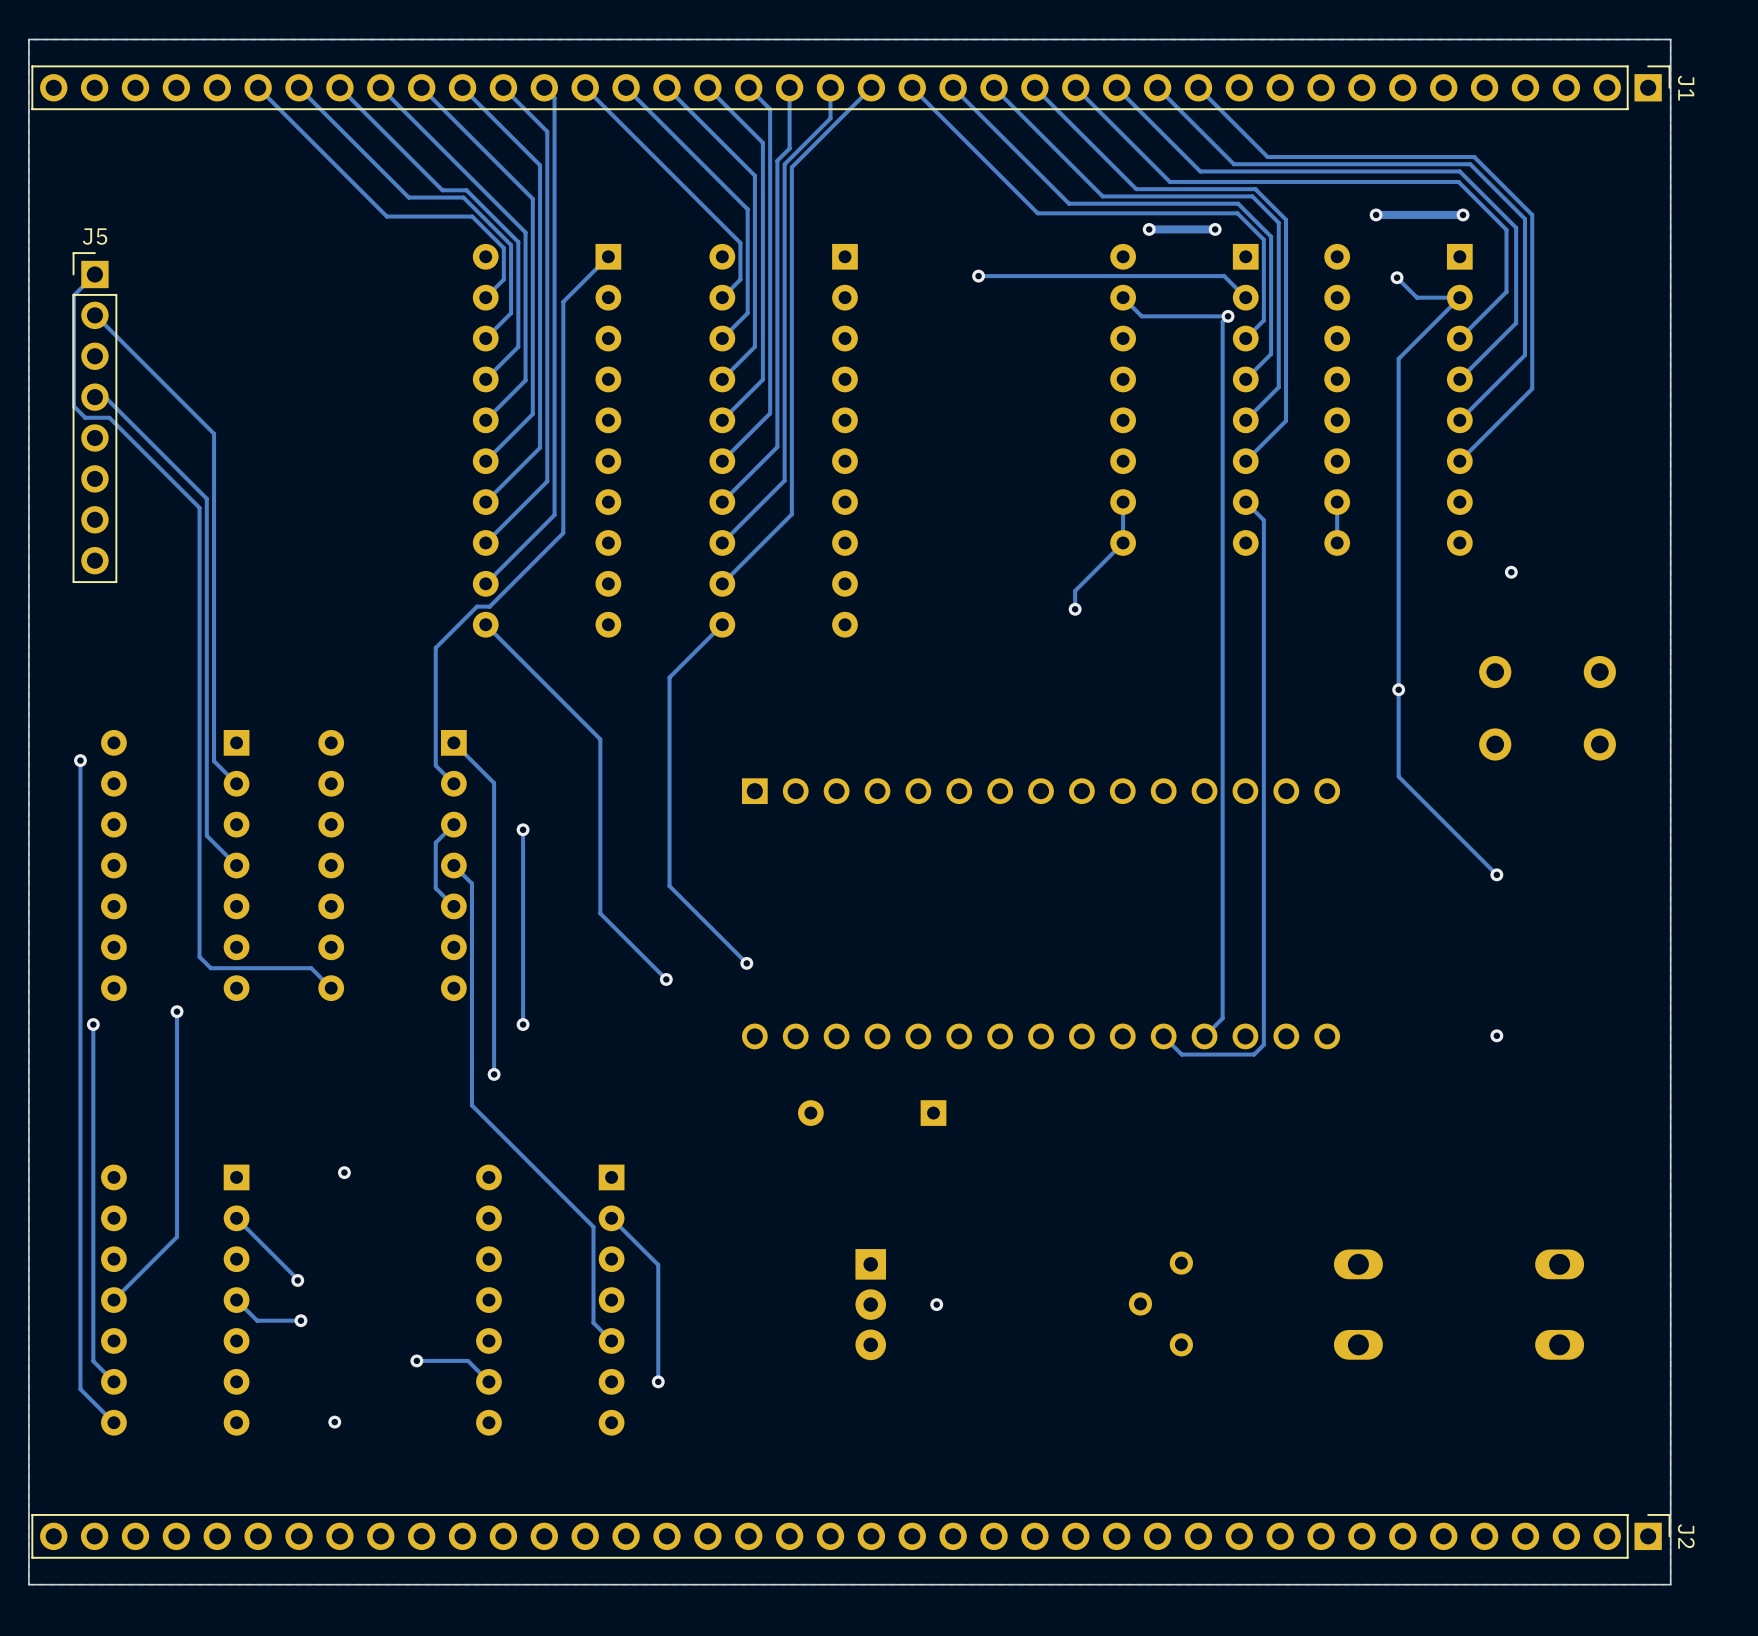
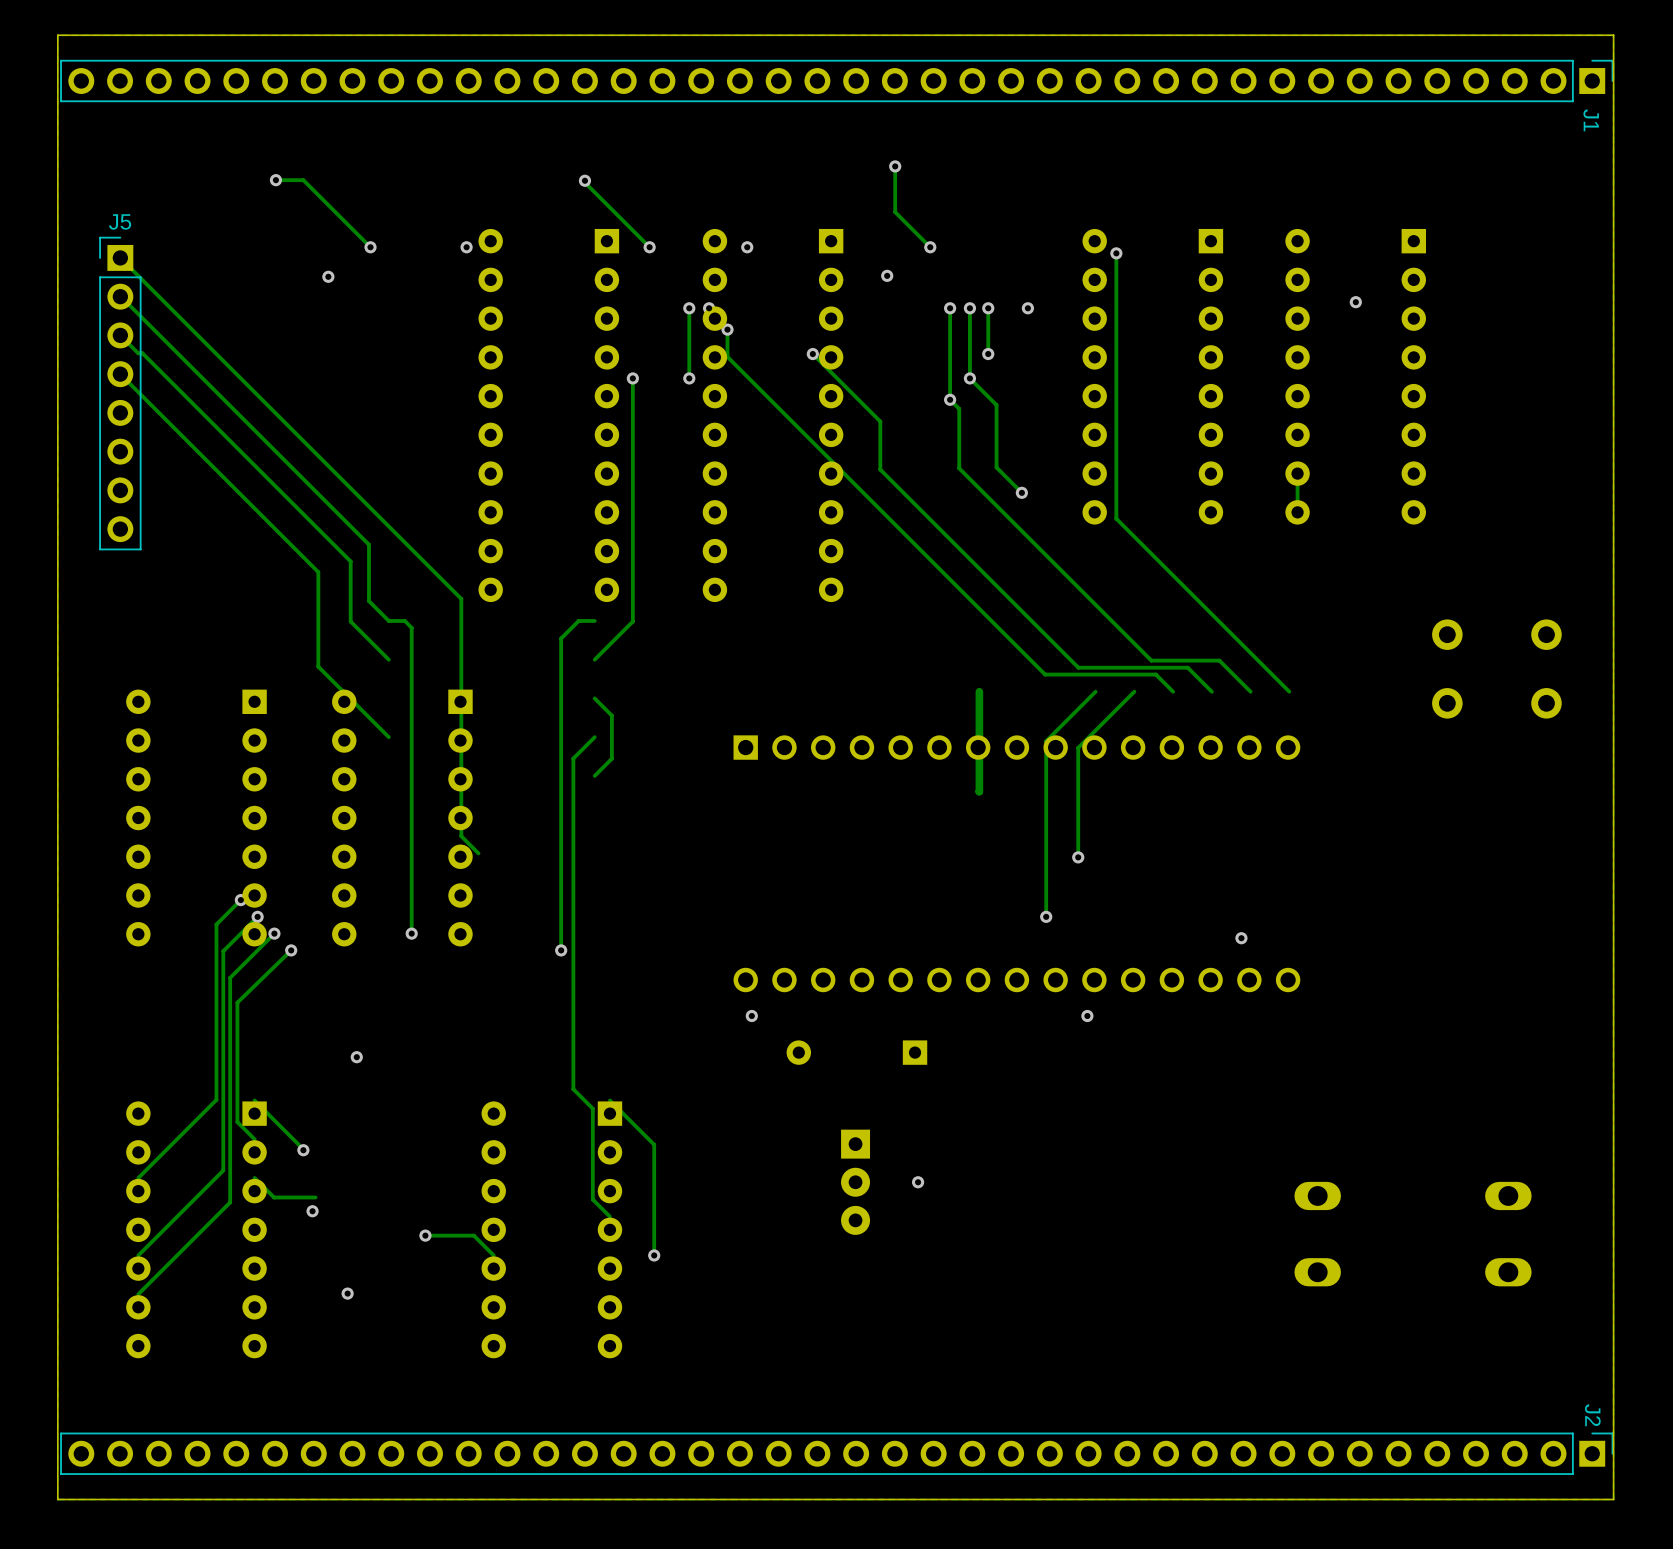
track: (258, 87) (386, 216) (472, 216) (503, 248) (503, 279) (485, 297) -> none
track: (299, 87) (408, 197) (463, 197) (511, 245) (511, 313) (485, 338) -> none
track: (339, 87) (442, 190) (466, 190) (518, 242) (518, 346) (485, 379) -> none
track: (380, 87) (525, 232) (525, 380) (485, 420) -> none
track: (421, 87) (532, 198) (532, 414) (485, 461) -> none
track: (462, 87) (540, 165) (540, 447) (485, 502) -> none
track: (503, 87) (547, 131) (547, 481) (485, 542) -> none
track: (544, 87) (554, 98) (554, 515) (485, 583) -> none
track: (585, 87) (740, 243) (740, 279) (722, 297) -> none
track: (626, 87) (747, 209) (747, 313) (722, 338) -> none
track: (666, 87) (754, 175) (754, 346) (722, 379) -> none
track: (707, 87) (762, 142) (762, 379) (722, 420) -> none
track: (748, 87) (770, 109) (770, 413) (722, 461) -> none
track: (789, 87) (789, 148) (777, 160) (777, 447) (722, 502) -> none
track: (830, 87) (830, 118) (784, 164) (784, 480) (722, 542) -> none
track: (871, 87) (791, 167) (791, 514) (722, 583) -> none
track: (912, 87) (1037, 213) (1237, 213) (1263, 239) (1263, 320) (1245, 338) -> none
track: (953, 87) (1069, 203) (1238, 203) (1271, 236) (1271, 354) (1245, 379) -> none
track: (994, 87) (1102, 196) (1252, 196) (1278, 222) (1278, 387) (1245, 420) -> none
track: (1034, 87) (1136, 189) (1255, 189) (1285, 219) (1285, 420) (1245, 461) -> none
track: (1075, 87) (1169, 181) (1458, 181) (1506, 229) (1506, 291) (1459, 338) -> none
track: (1116, 87) (1200, 171) (1459, 171) (1516, 227) (1516, 323) (1459, 379) -> none
track: (1157, 87) (1234, 164) (1470, 164) (1525, 218) (1525, 355) (1459, 420) -> none
track: (1198, 87) (1267, 157) (1474, 157) (1532, 214) (1532, 388) (1459, 461) -> none
J1 name position: J1 (1686, 88) -> J1 (1591, 120)
track: none -> (895, 166) (895, 212) (930, 247)
via: none -> (895, 166)
track: none -> (275, 180) (303, 180) (370, 247)
via: none -> (275, 180)
track: none -> (584, 180) (649, 247)
via: none -> (584, 180)
via: (1376, 214) -> none
track: (1463, 214) (1376, 214) -> none
via: (1463, 214) -> none
via: (1149, 229) -> none
track: (1215, 229) (1149, 229) -> none
via: (1215, 229) -> none
track: (608, 256) (563, 301) (563, 533) (489, 606) (477, 606) (435, 647) (435, 765) (453, 783) -> none
via: none -> (370, 247)
via: none -> (466, 247)
via: none -> (649, 247)
via: none -> (747, 247)
via: none -> (930, 247)
track: none -> (1116, 253) (1116, 518) (1289, 691)
via: none -> (1116, 253)
track: (94, 274) (74, 295) (74, 406) (85, 417) (109, 417) (199, 507) (199, 956) (210, 968) (311, 968) (331, 988) -> (120, 257) (461, 598) (461, 836) (478, 853)
track: (978, 276) (1224, 276) (1245, 297) -> none
via: (978, 276) -> none
track: (1397, 277) (1417, 297) (1459, 297) (1398, 358) (1398, 776) (1496, 874) -> none
via position: (1397, 277) -> (1355, 302)
via: none -> (887, 275)
via: none -> (328, 276)
track: (1123, 297) (1141, 316) (1228, 316) (1222, 321) (1222, 1018) (1204, 1036) -> none
via: (1228, 316) -> none
track: none -> (689, 308) (689, 378)
via: none -> (689, 308)
via: none -> (709, 308)
track: none -> (950, 308) (950, 399) (959, 408) (959, 468) (1151, 660) (1219, 660) (1250, 691)
via: none -> (950, 308)
track: none -> (969, 308) (969, 378) (996, 405) (996, 467) (1021, 492)
via: none -> (969, 308)
track: none -> (988, 308) (988, 354)
via: none -> (988, 308)
via: none -> (1027, 308)
track: none -> (727, 329) (727, 356) (1045, 674) (1155, 674) (1173, 691)
via: none -> (727, 329)
track: none -> (120, 335) (138, 353) (142, 353) (350, 561) (350, 621) (388, 659)
track: none -> (812, 354) (880, 421) (880, 469) (1078, 667) (1187, 667) (1211, 691)
via: none -> (812, 354)
via: none -> (988, 354)
track: (94, 397) (105, 397) (206, 498) (206, 835) (236, 865) -> (120, 374) (318, 572) (318, 666) (388, 737)
track: none -> (632, 378) (632, 621) (594, 659)
via: none -> (632, 378)
via: none -> (689, 378)
via: none -> (969, 378)
via: none -> (950, 399)
track: (214, 433) (214, 761) (236, 783) -> (233, 408) (368, 544) (368, 601) (388, 620) (404, 620) (411, 627) (411, 933)
track: (1123, 502) (1123, 542) (1075, 590) (1075, 609) -> none
track: (1245, 502) (1263, 520) (1263, 1044) (1254, 1054) (1181, 1054) (1163, 1036) -> none
via: (1511, 572) -> none
via position: (1075, 609) -> (1021, 492)
track: (485, 624) (600, 739) (600, 913) (666, 979) -> none
track: (722, 624) (669, 677) (669, 886) (746, 963) -> none
track: none -> (594, 620) (578, 620) (561, 638) (561, 950)
via: (1398, 689) -> none
track: none -> (979, 691) (979, 791)
track: none -> (1095, 691) (1046, 741) (1046, 916)
track: none -> (1134, 691) (1078, 747) (1078, 857)
track: none -> (594, 698) (611, 715) (611, 758) (594, 775)
track: (453, 742) (494, 783) (494, 1074) -> none
track: (80, 760) (80, 1389) (113, 1422) -> none
via: (80, 760) -> none
track: (453, 824) (435, 842) (435, 888) (453, 906) -> none
track: (523, 829) (523, 1024) -> none
via: (523, 829) -> none
track: (453, 865) (471, 883) (471, 1105) (593, 1226) -> (594, 737) (573, 758) (573, 1089) (592, 1108) (592, 1160)
via: (1496, 874) -> none
via: none -> (1078, 857)
track: none -> (240, 900) (216, 924) (216, 1099) (138, 1177)
via: none -> (240, 900)
via: (746, 963) -> none
track: none -> (257, 916) (223, 951) (223, 1170) (138, 1255)
via: none -> (257, 916)
via: none -> (1046, 916)
via: (666, 979) -> none
track: none -> (274, 933) (230, 977) (230, 1202) (138, 1294)
via: none -> (274, 933)
via: none -> (411, 933)
via: none -> (1241, 938)
track: none -> (291, 950) (237, 1002) (237, 1122) (254, 1139)
via: none -> (291, 950)
track: (177, 1011) (177, 1236) (113, 1300) -> none
via: (177, 1011) -> none
track: (93, 1024) (93, 1361) (113, 1381) -> none
via: (93, 1024) -> none
via position: (523, 1024) -> (561, 950)
via: (1496, 1035) -> none
via: (494, 1074) -> none
via: none -> (751, 1016)
via: none -> (1087, 1016)
via: none -> (356, 1057)
track: none -> (254, 1100) (303, 1150)
via: (344, 1172) -> none
via: none -> (303, 1150)
track: (236, 1218) (297, 1280) -> none
track: (611, 1218) (658, 1265) -> (609, 1100) (654, 1144) (654, 1196)
track: (593, 1268) (593, 1322) (611, 1340) -> (592, 1199) (609, 1216)
track: (236, 1300) (257, 1320) (300, 1320) -> (254, 1177) (274, 1197) (315, 1197)
part: (1160, 1303) -> none
part position: (870, 1304) -> (855, 1182)
via position: (936, 1304) -> (918, 1182)
via: none -> (425, 1235)
via: (300, 1320) -> none
track: (658, 1327) (658, 1381) -> none
track: (416, 1360) (468, 1360) (488, 1381) -> (425, 1235) (473, 1235) (493, 1255)
via: (416, 1360) -> none
via: none -> (347, 1293)
via position: (658, 1381) -> (654, 1255)
via: (334, 1422) -> none
J2 name position: J2 (1686, 1536) -> J2 (1592, 1415)

